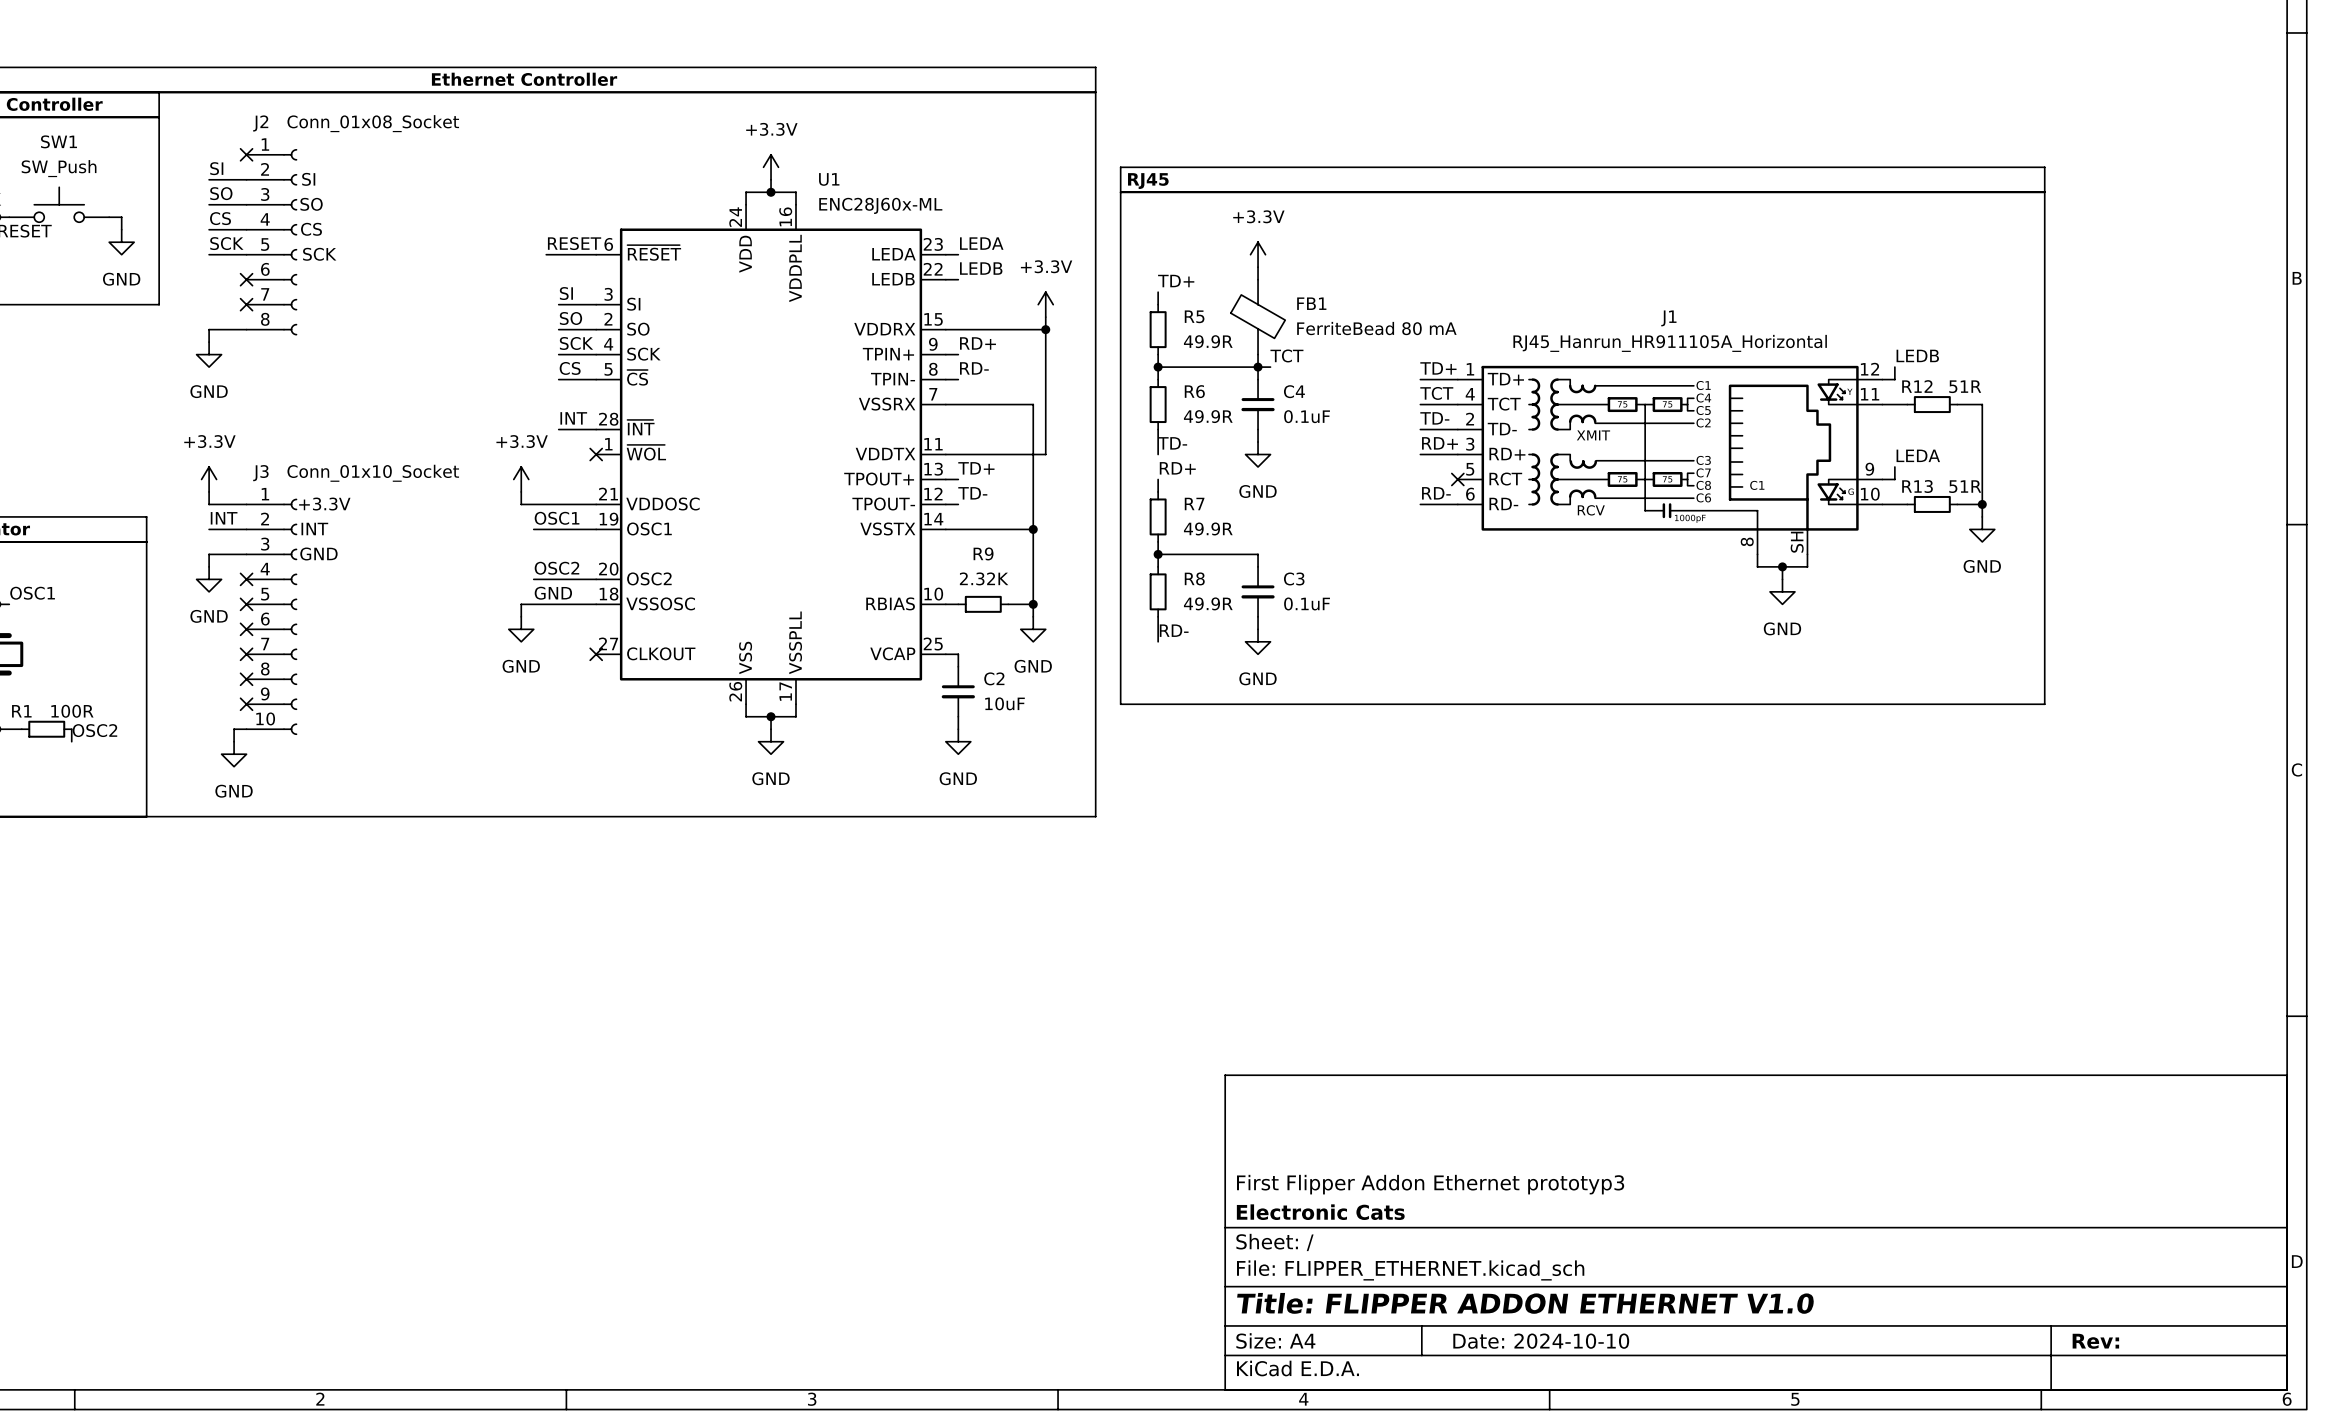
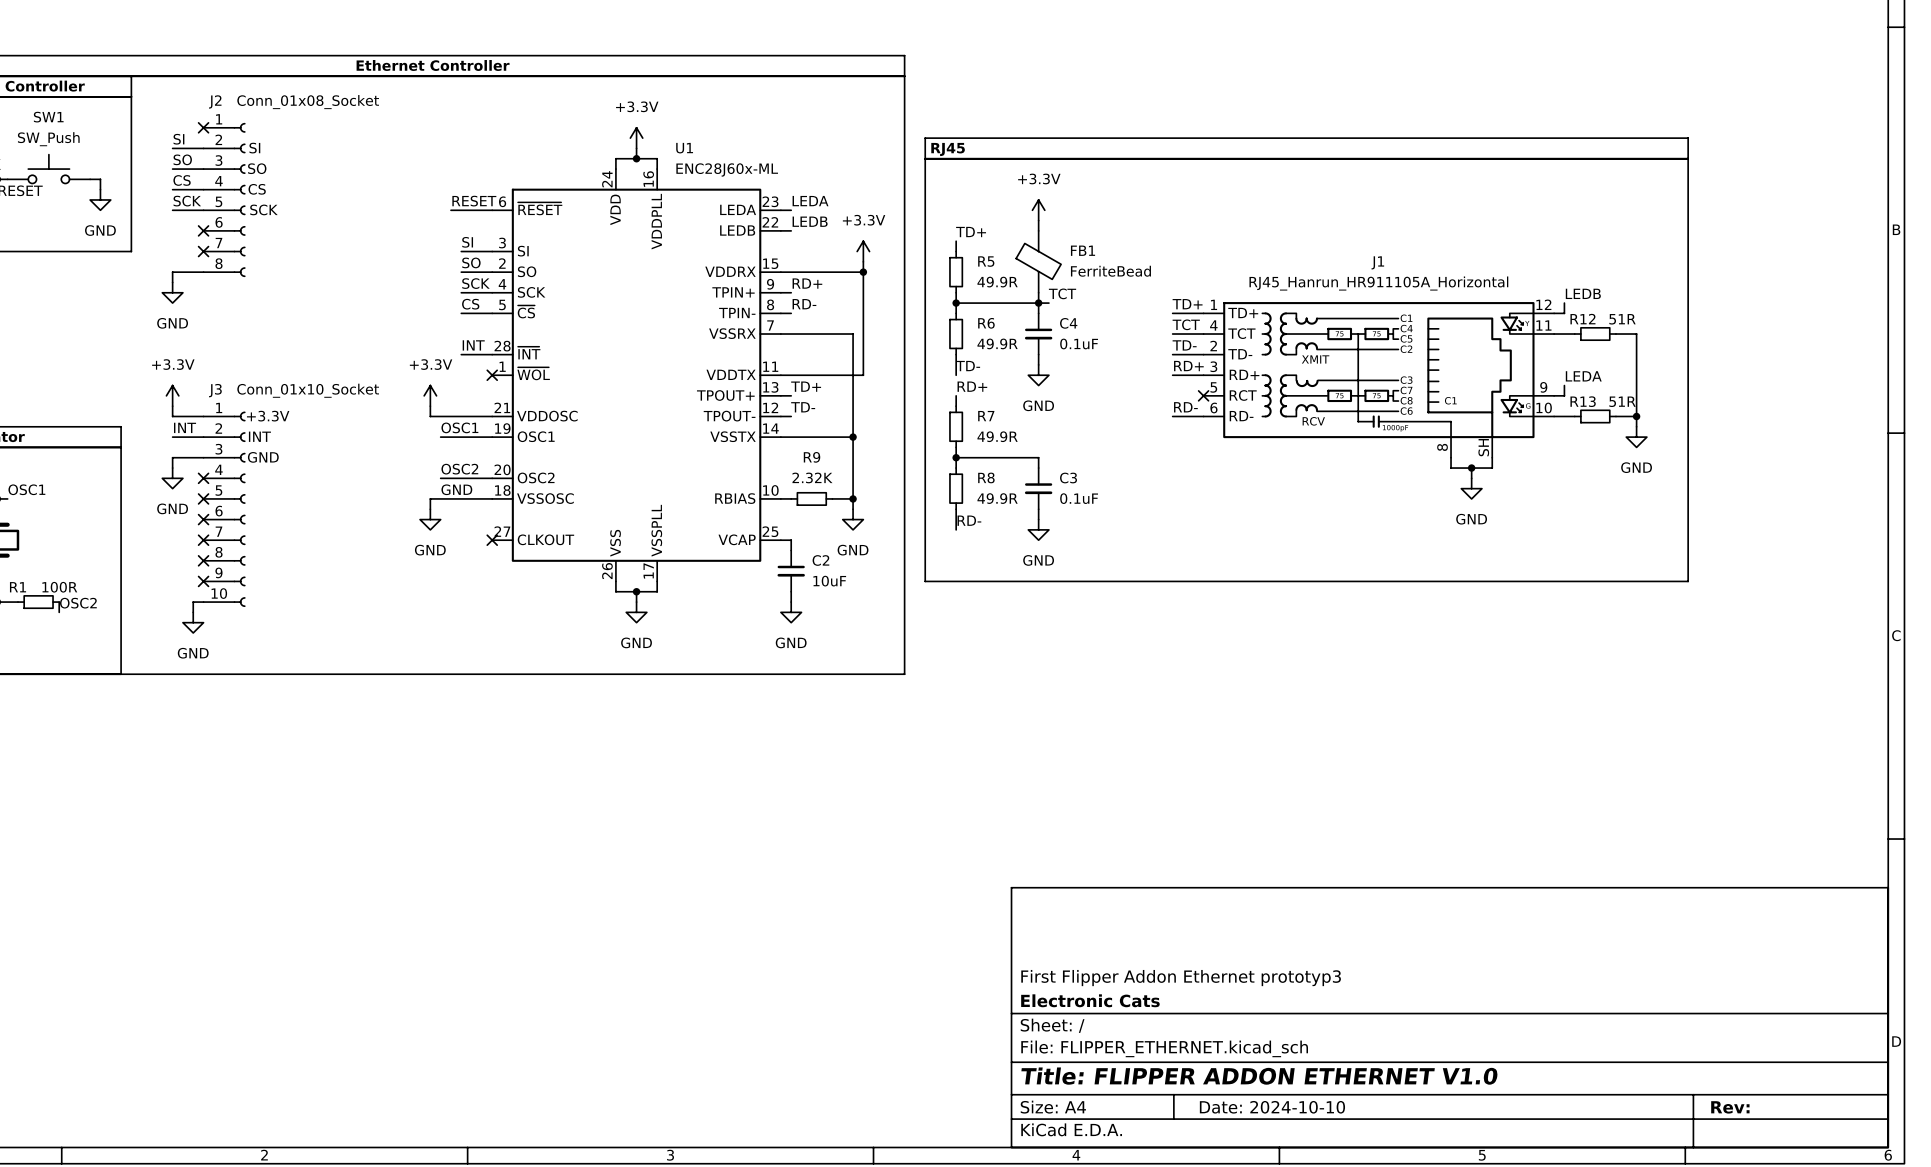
FB1 value: FerriteBead 80 mA (1376, 328) -> FerriteBead (1110, 271)

